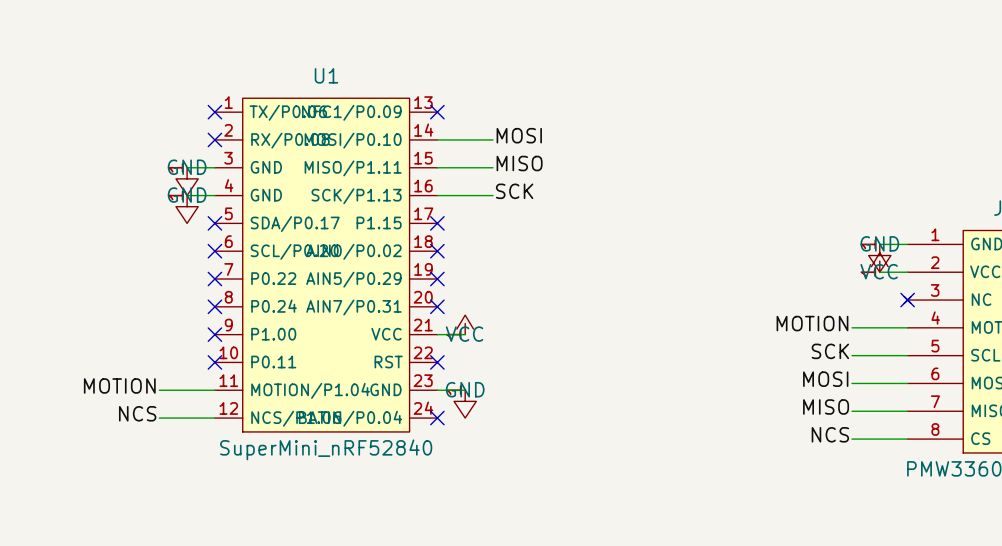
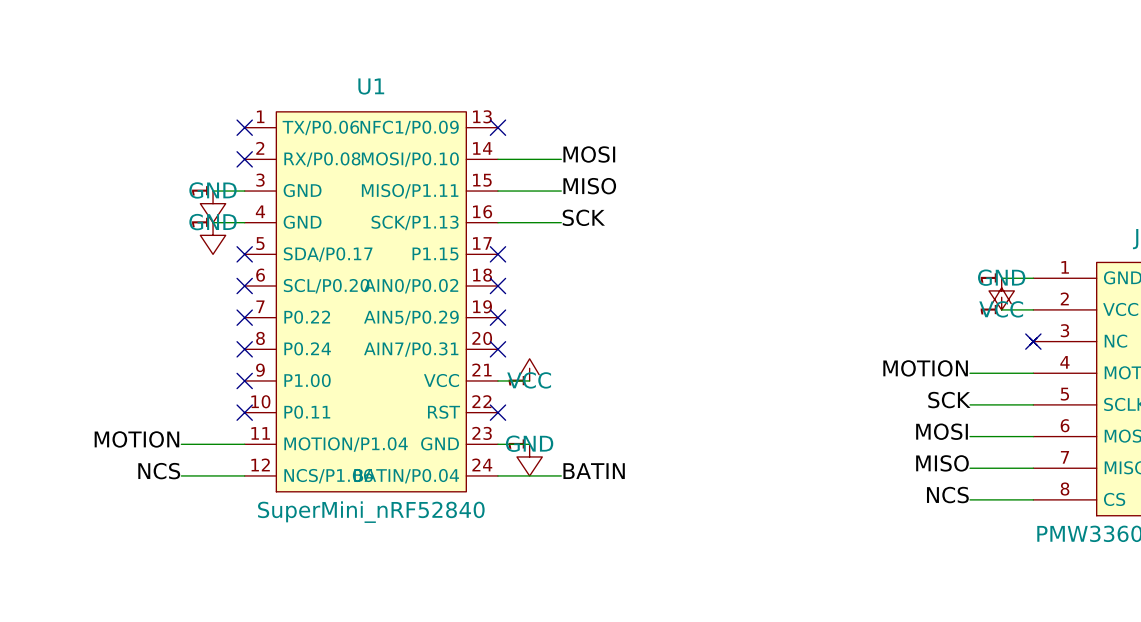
label: none -> BATIN (594, 471)
wire: none -> (497, 475) (561, 475)
no-connect mark: (437, 418) -> none

